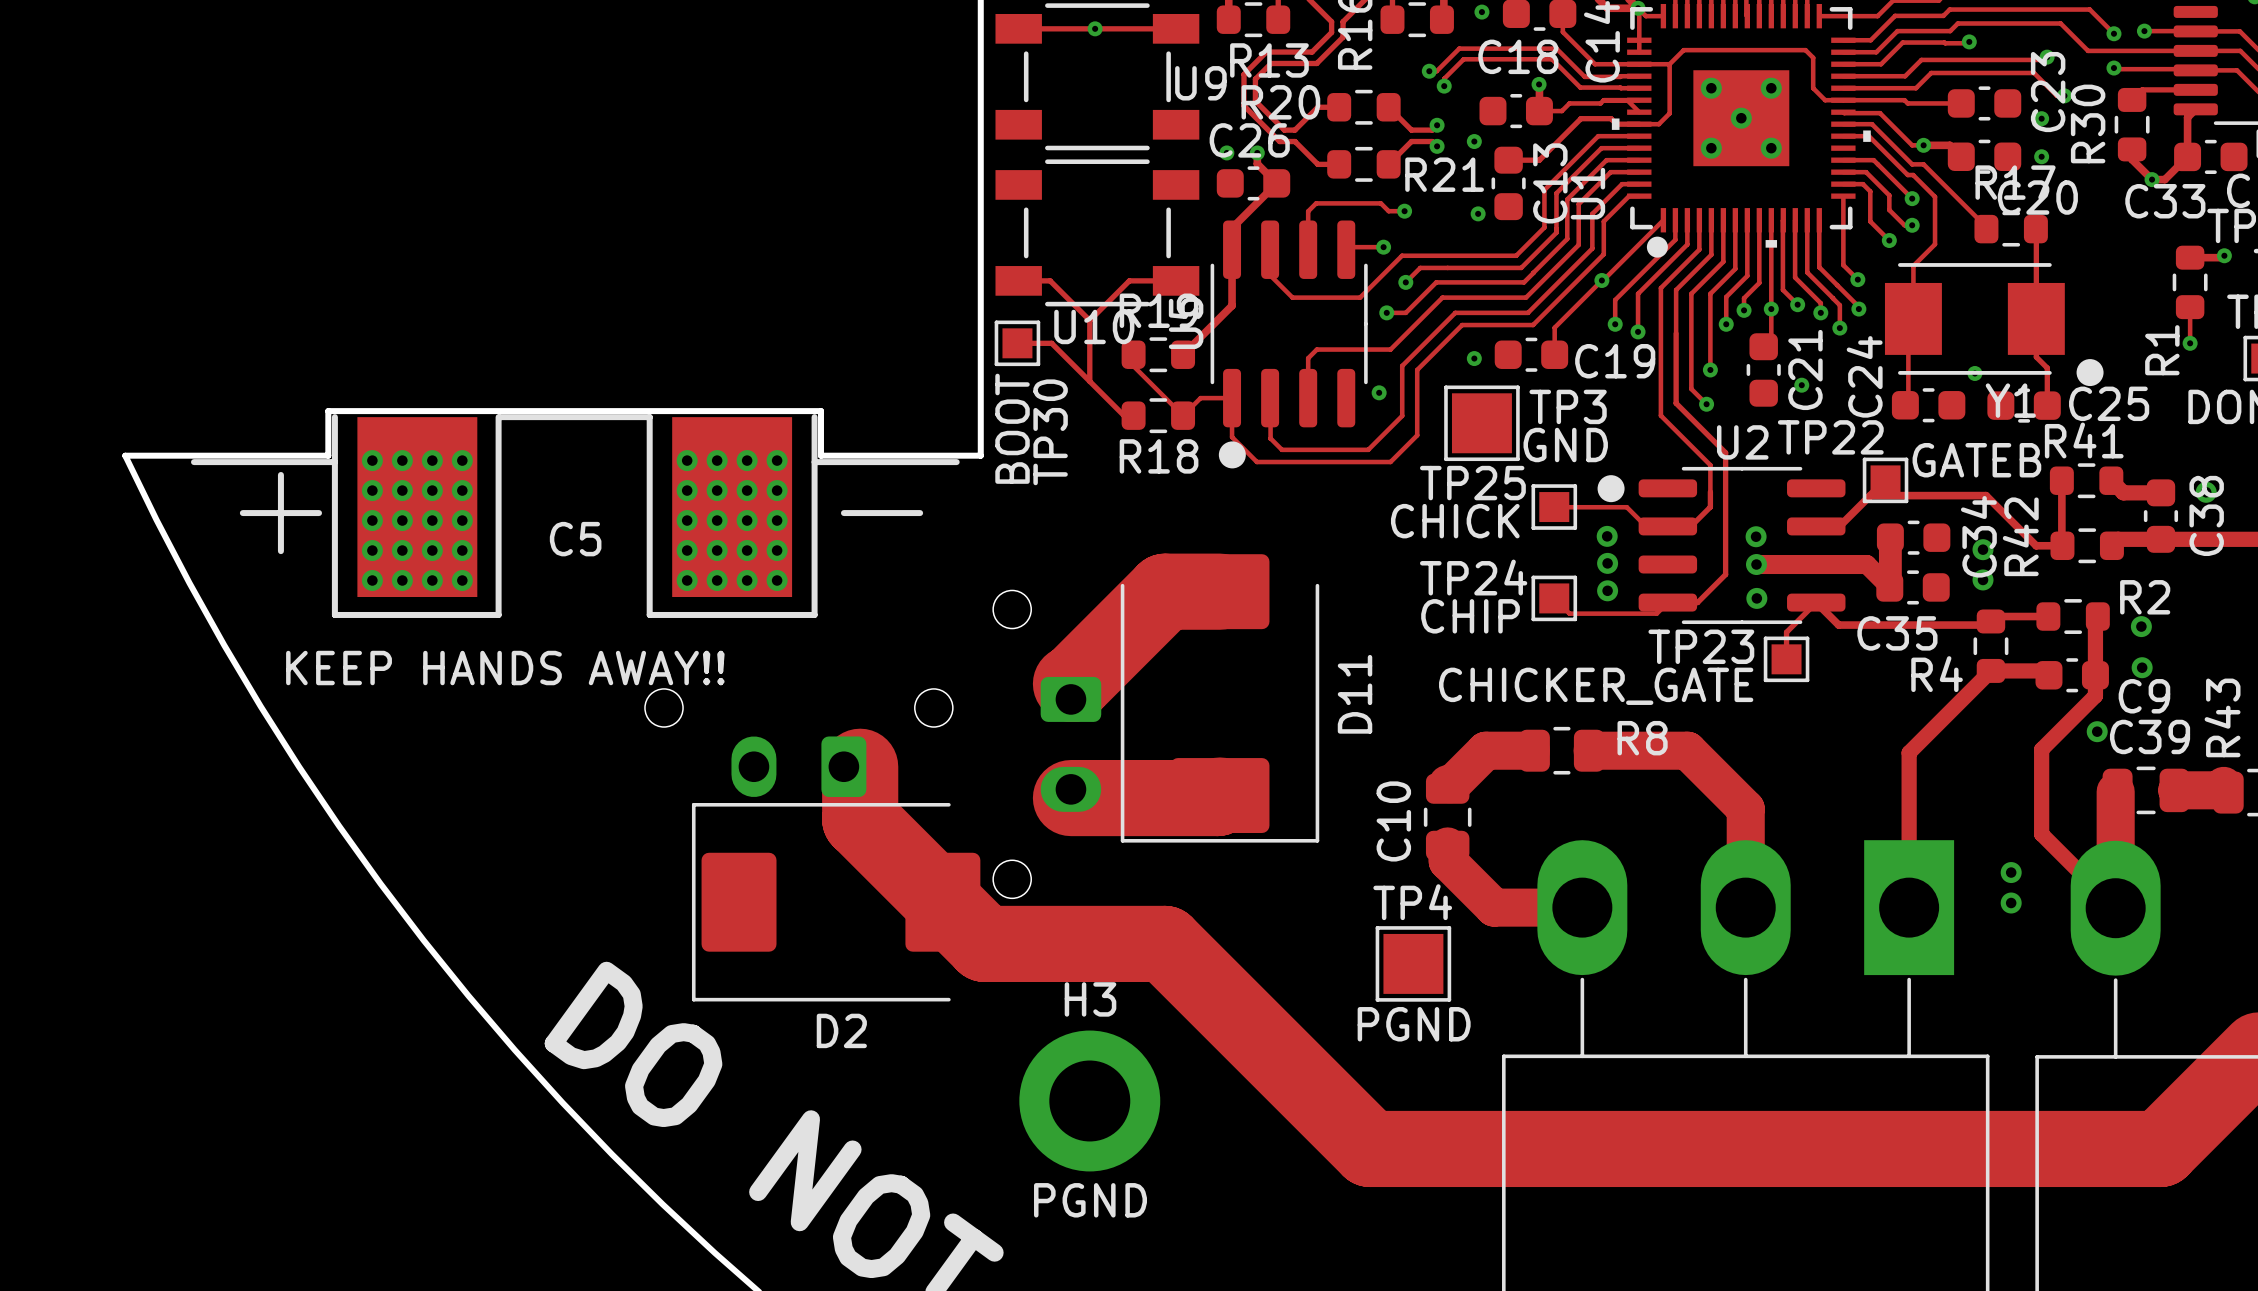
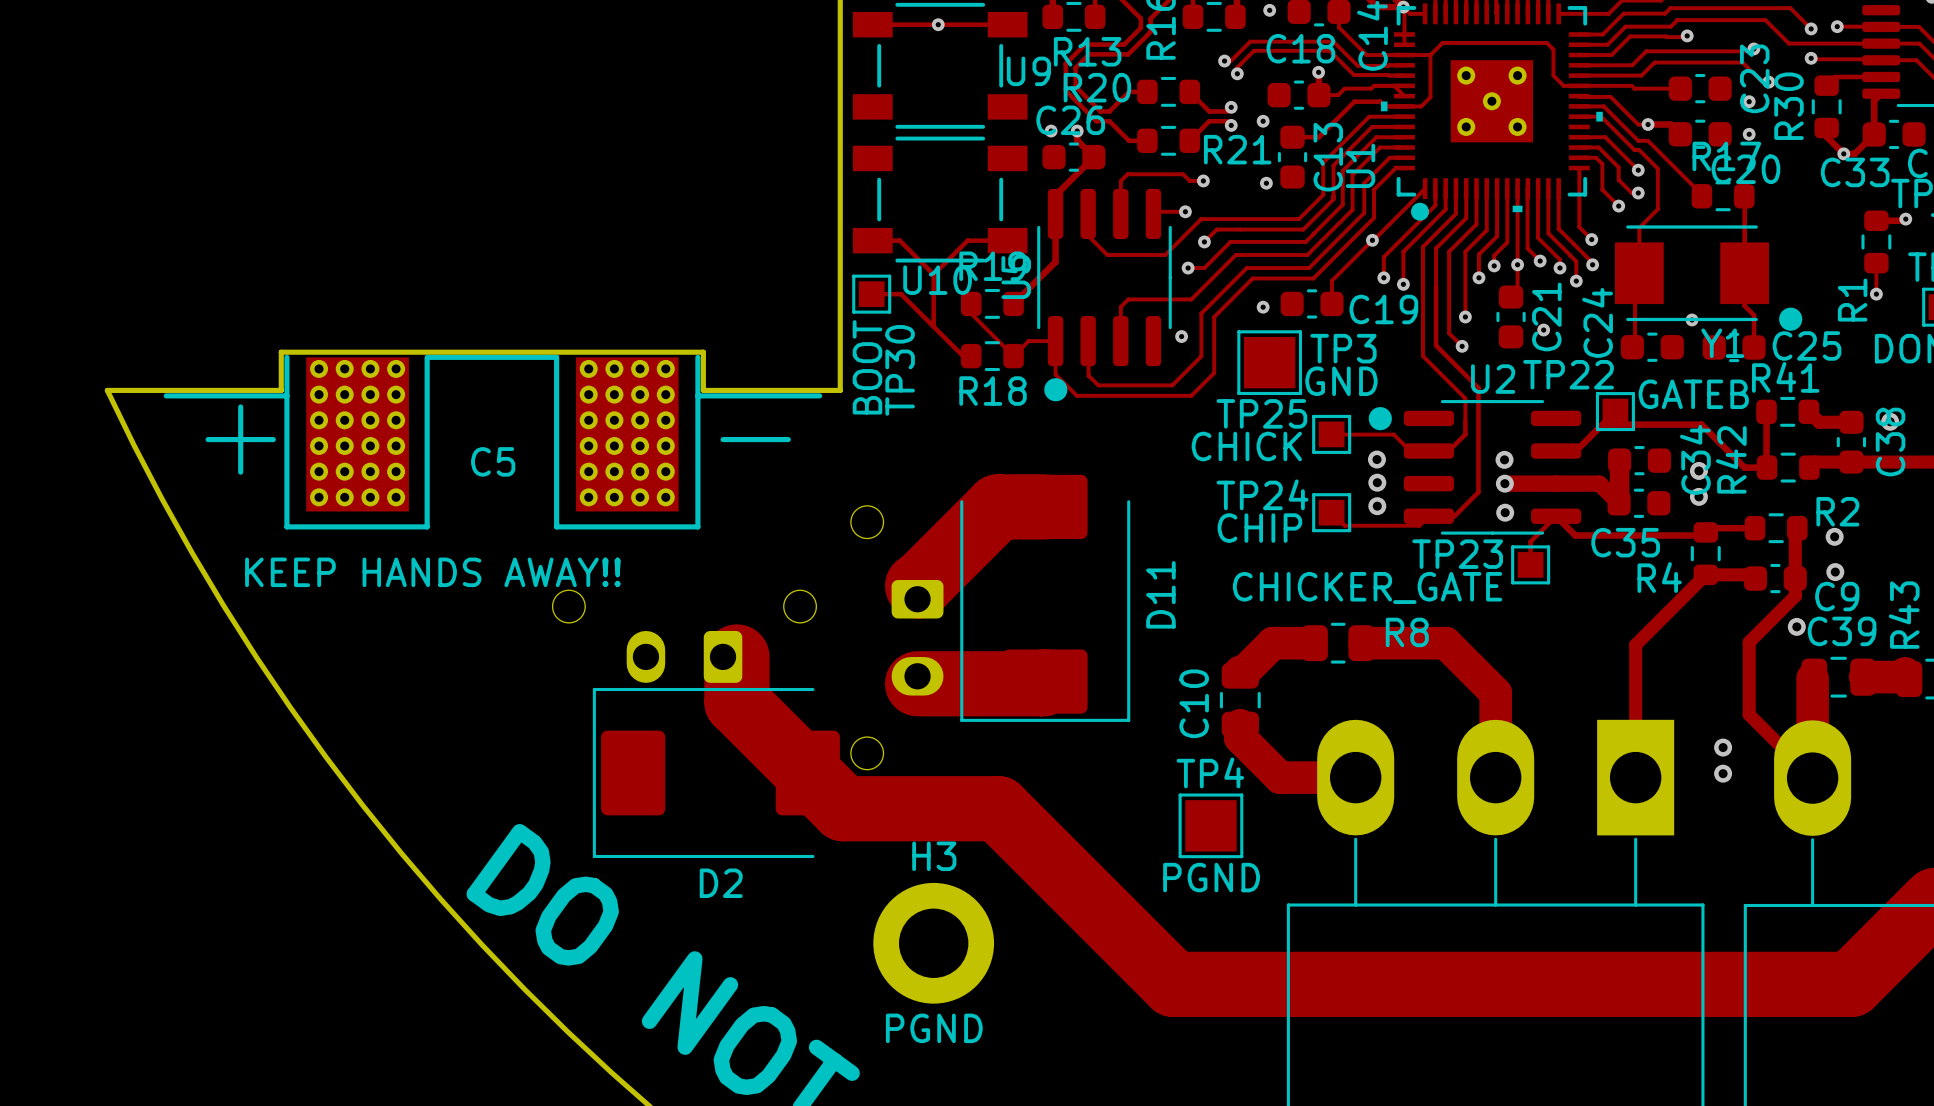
C5 footprint: [191, 414, 960, 618] -> [163, 354, 823, 530]

